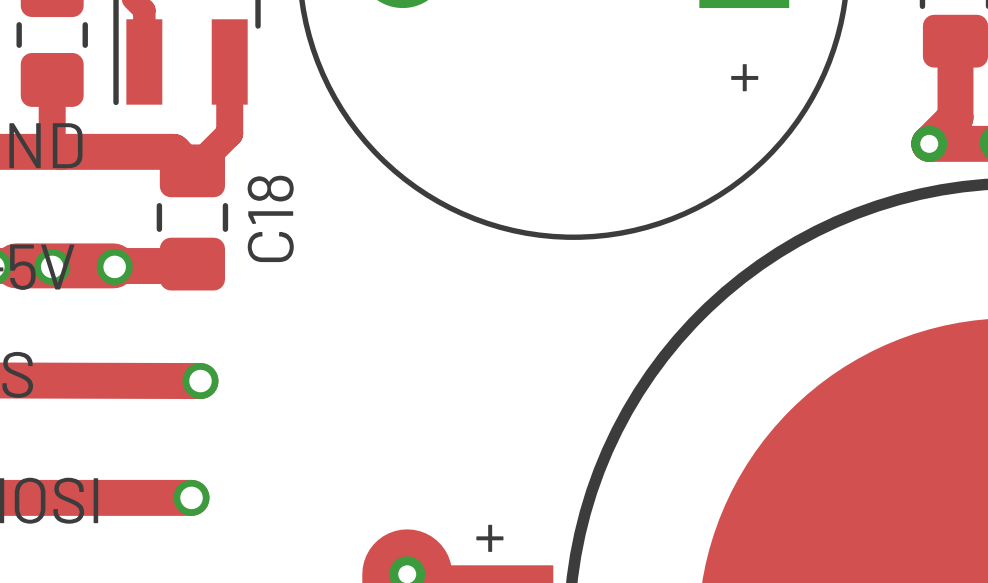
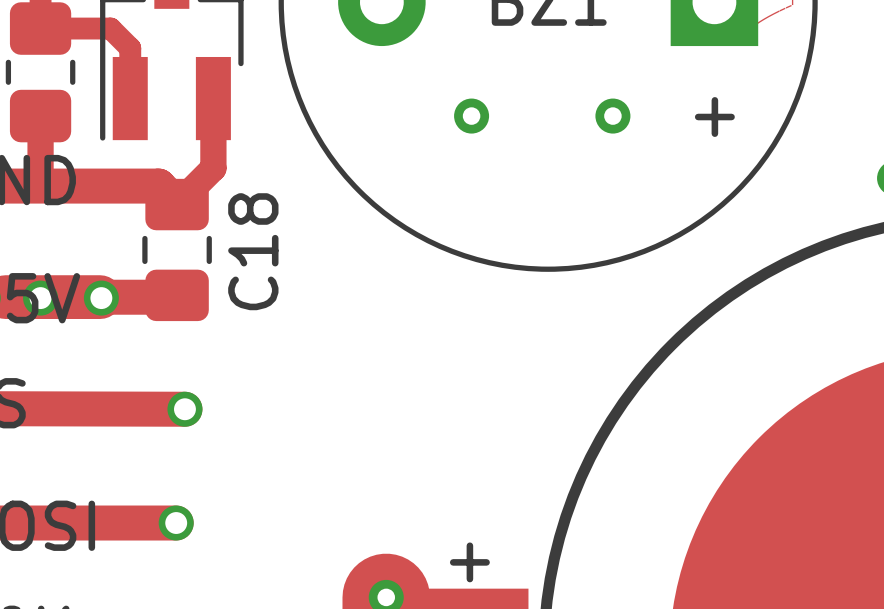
via: none -> (471, 116)
via: none -> (612, 116)

